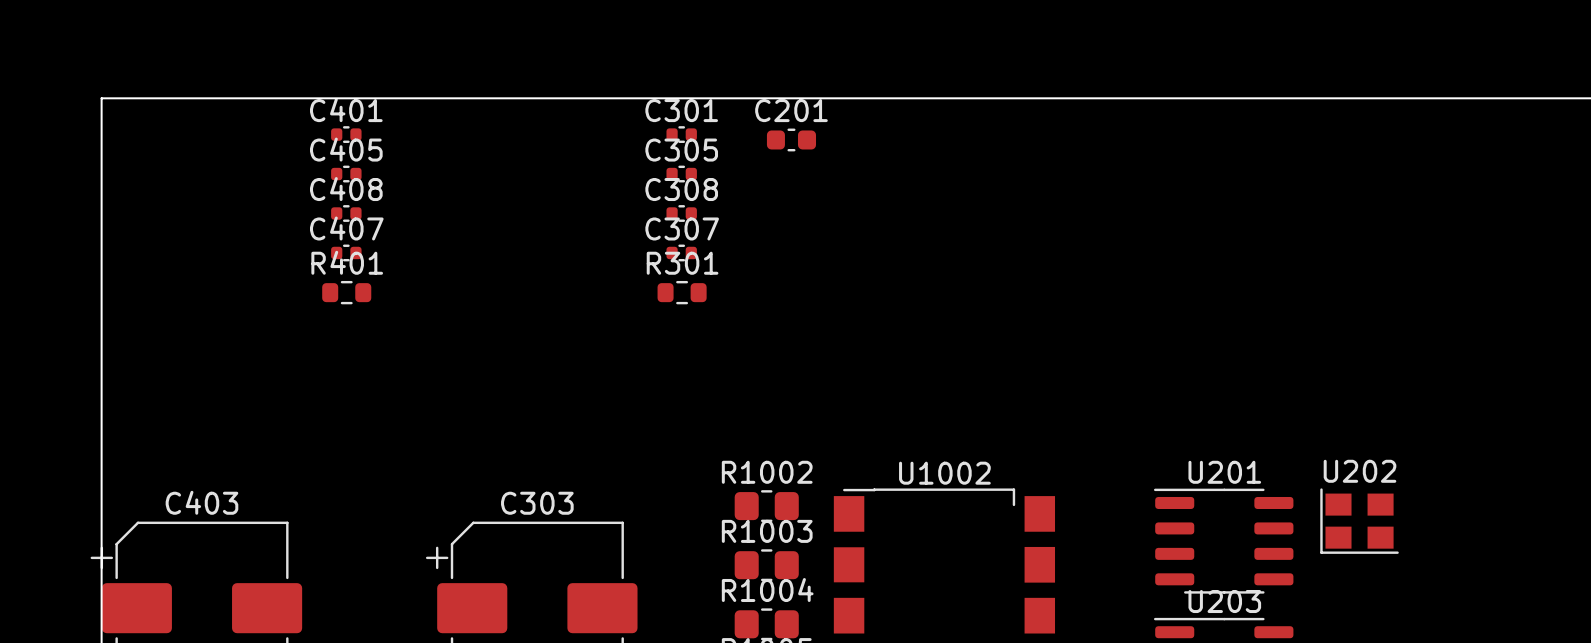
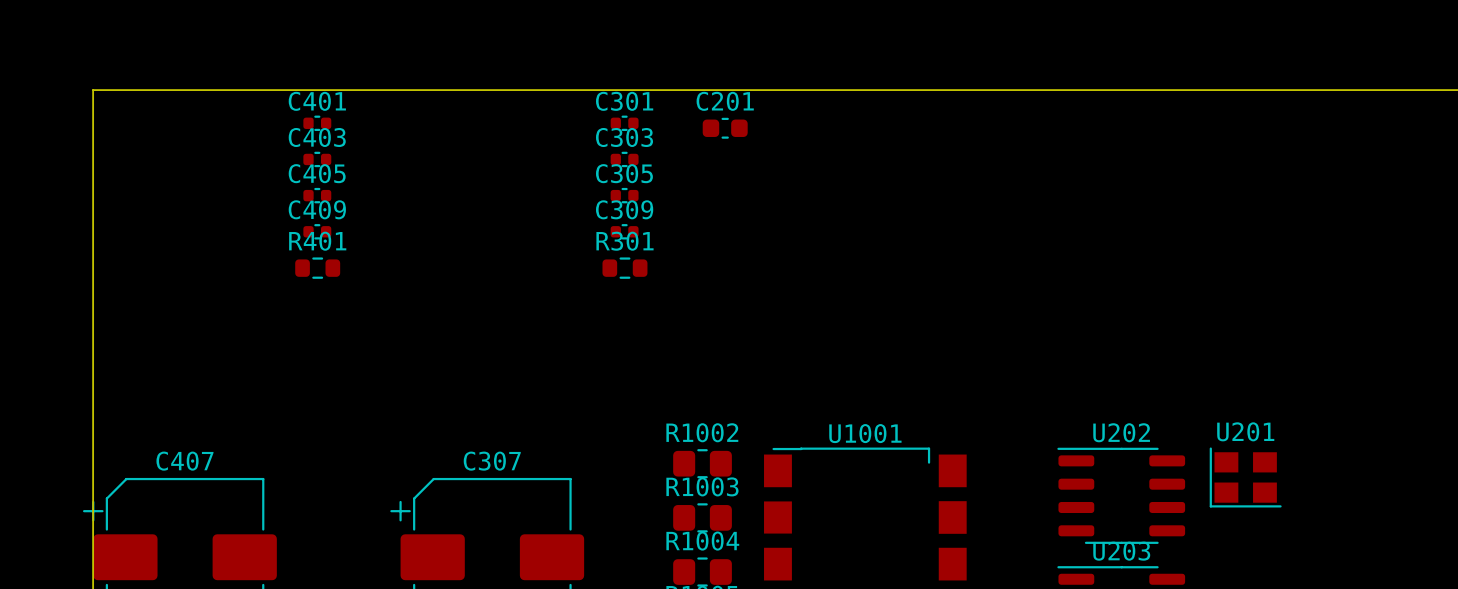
C405 name: C405 (346, 149) -> C403 (317, 137)
C305 name: C305 (681, 150) -> C303 (624, 137)
C408 name: C408 (346, 189) -> C405 (317, 173)
C308 name: C308 (681, 189) -> C305 (624, 173)
C407 name: C407 (346, 228) -> C409 (317, 209)
C307 name: C307 (682, 228) -> C309 (624, 209)
U202 name: U202 (1360, 471) -> U201 (1245, 431)
U201 name: U201 (1224, 472) -> U202 (1121, 432)
U1002 name: U1002 (944, 473) -> U1001 (865, 433)
C403 name: C403 (201, 502) -> C407 (184, 461)
C303 name: C303 (537, 503) -> C307 (492, 461)

